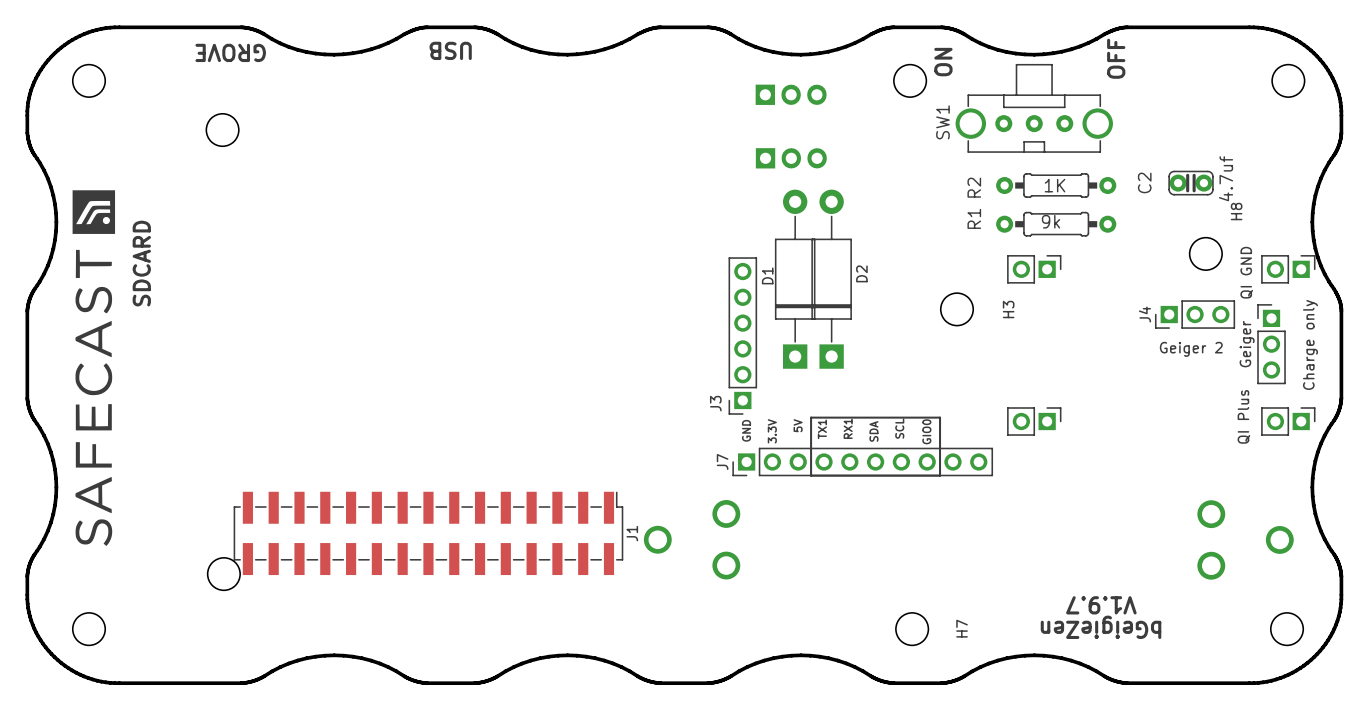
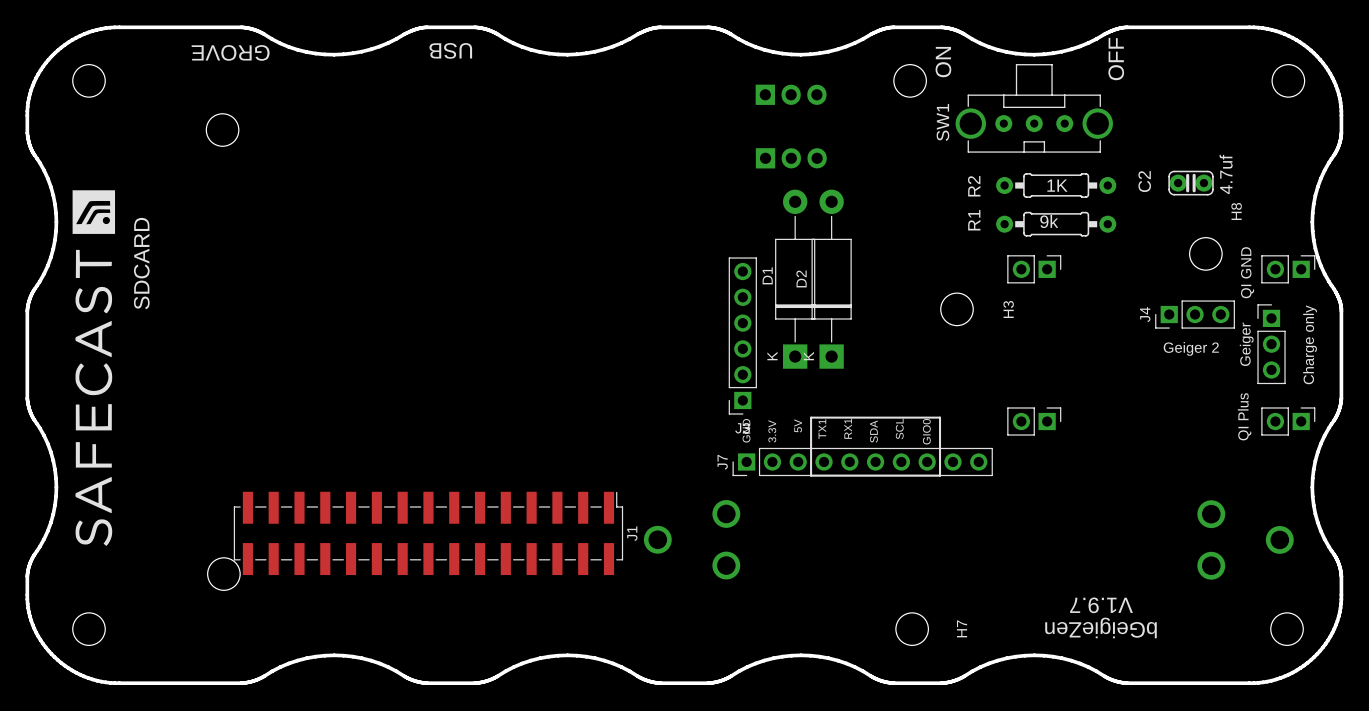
D2 name position: D2 (861, 273) -> D2 (801, 278)
D1 text: none -> K (772, 356)
D2 text: none -> K (808, 356)
J3 name rotation: 0° (715, 403) -> 90° clockwise (742, 428)
J3 name position: J3 (715, 403) -> J3 (742, 428)

